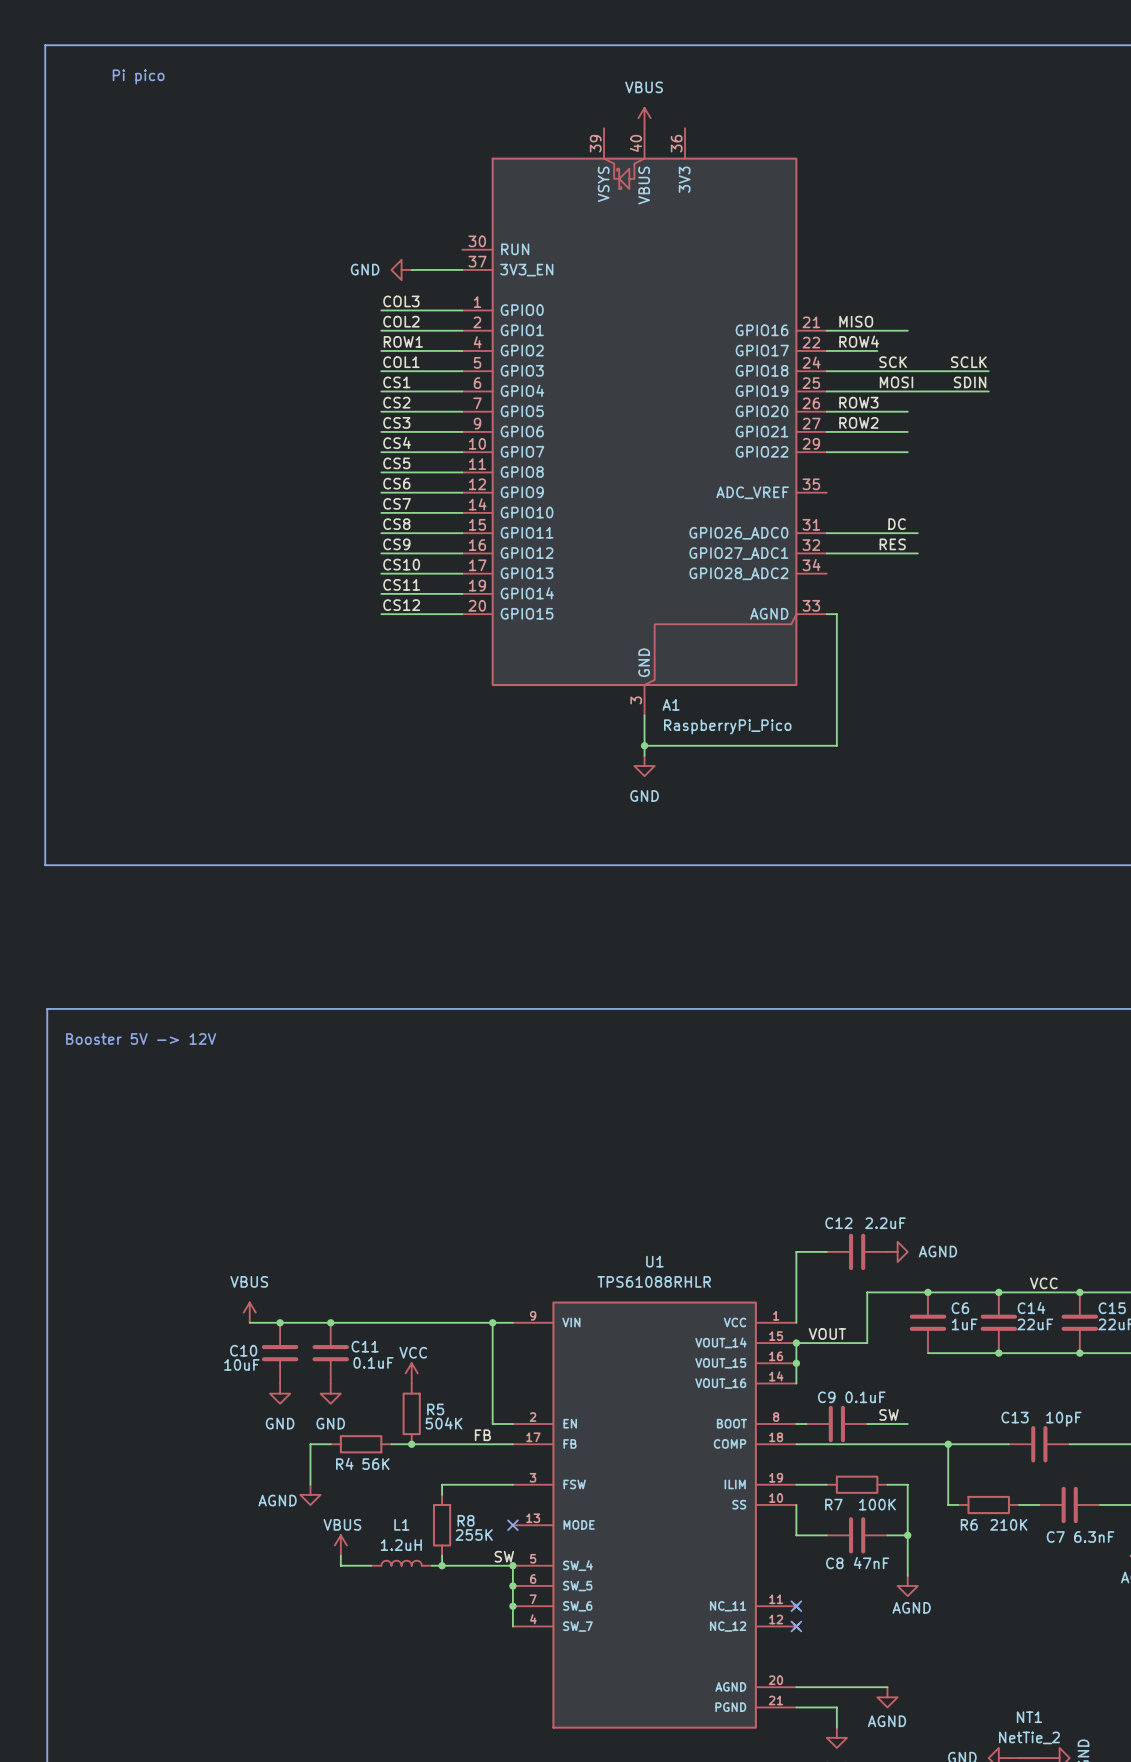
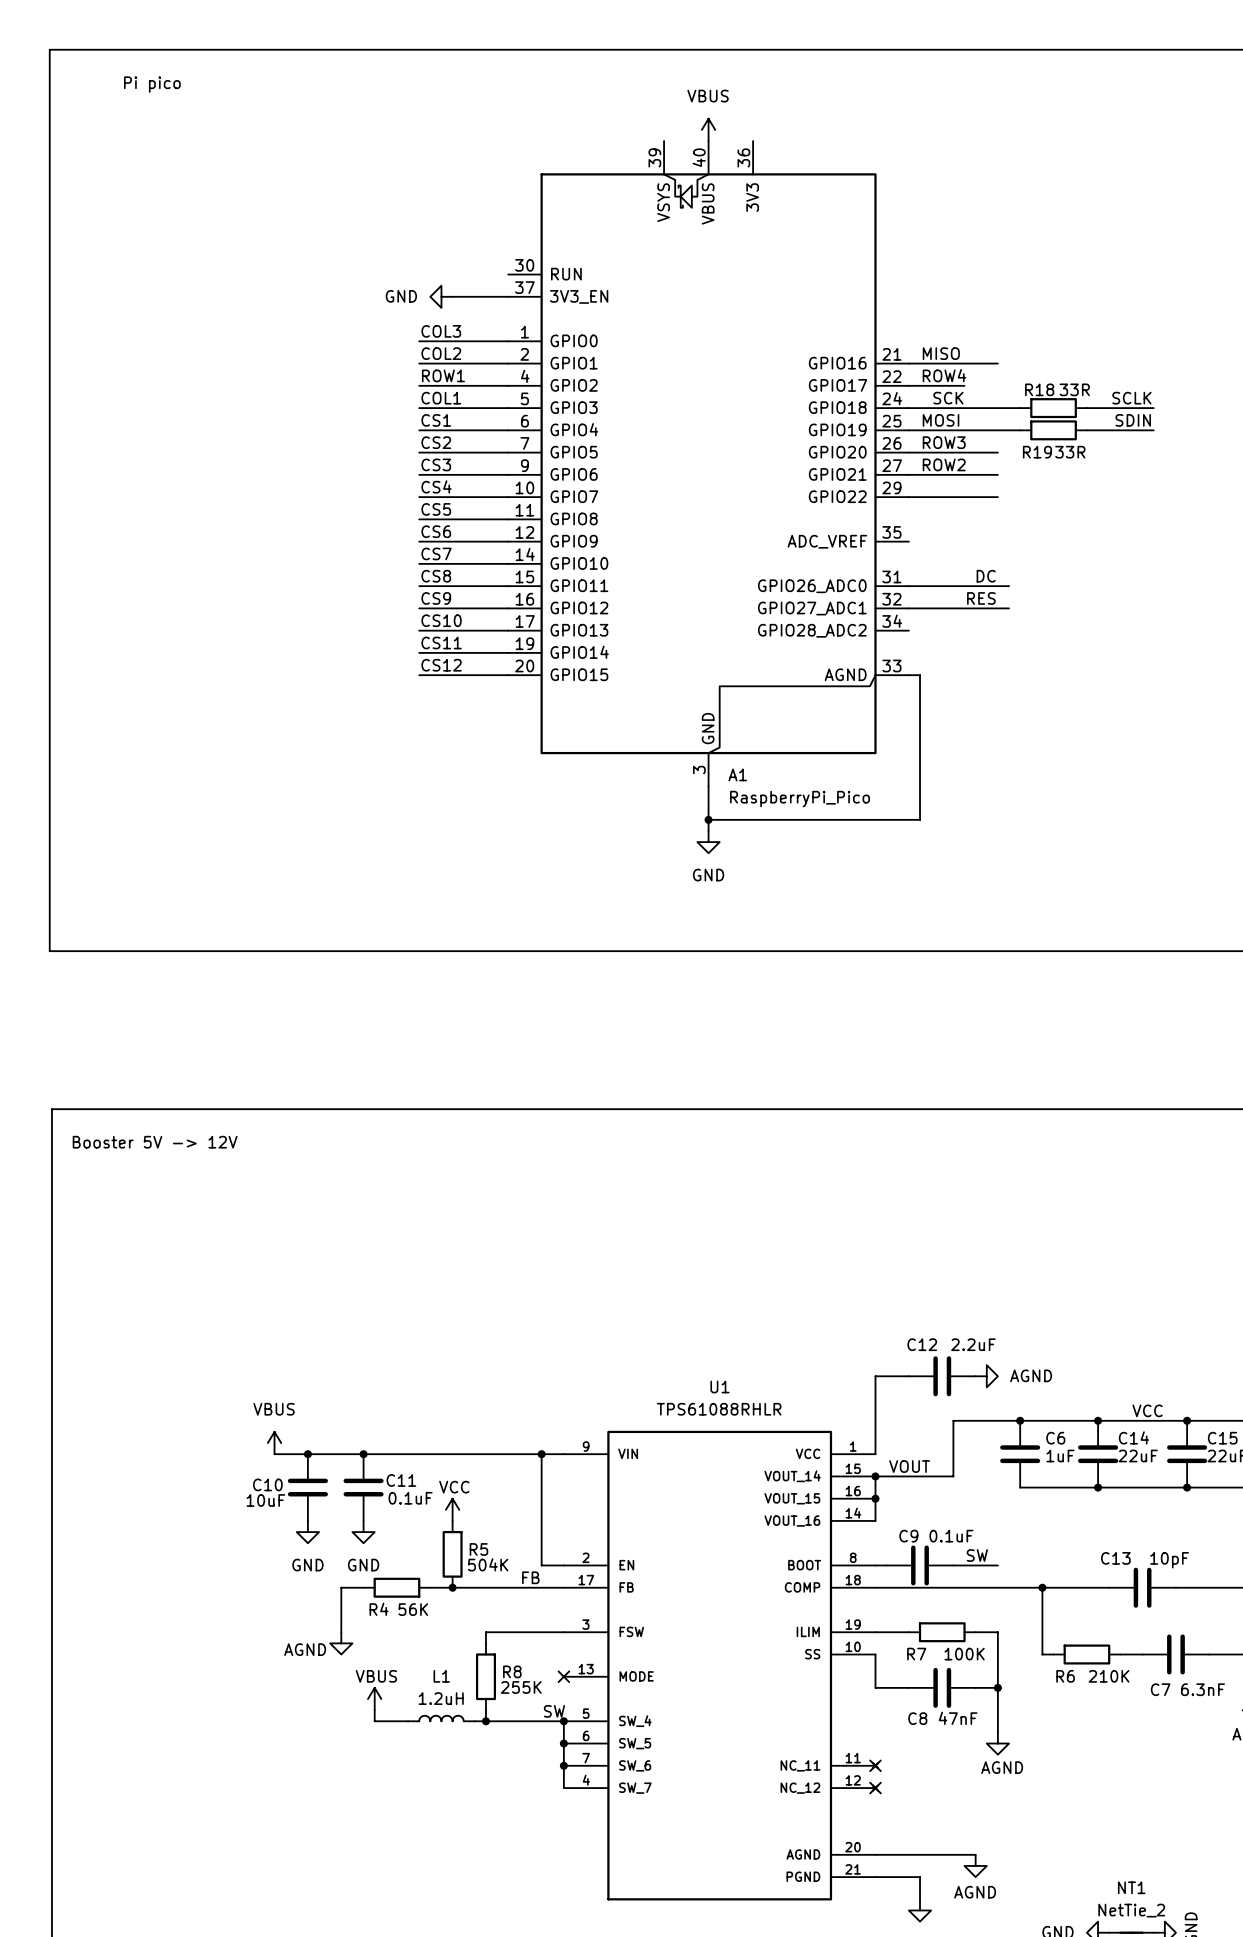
label position: SCK (893, 362) -> SCK (948, 398)
label position: SCLK (968, 362) -> SCLK (1131, 398)
wire: (927, 371) (988, 371) -> (1153, 408) (1086, 408)
R18: none -> 33R (1053, 408)
label position: MOSI (896, 382) -> MOSI (941, 420)
label position: SDIN (970, 382) -> SDIN (1133, 420)
wire: (927, 391) (988, 391) -> (1153, 430) (1086, 430)
R19: none -> 33R (1053, 430)

